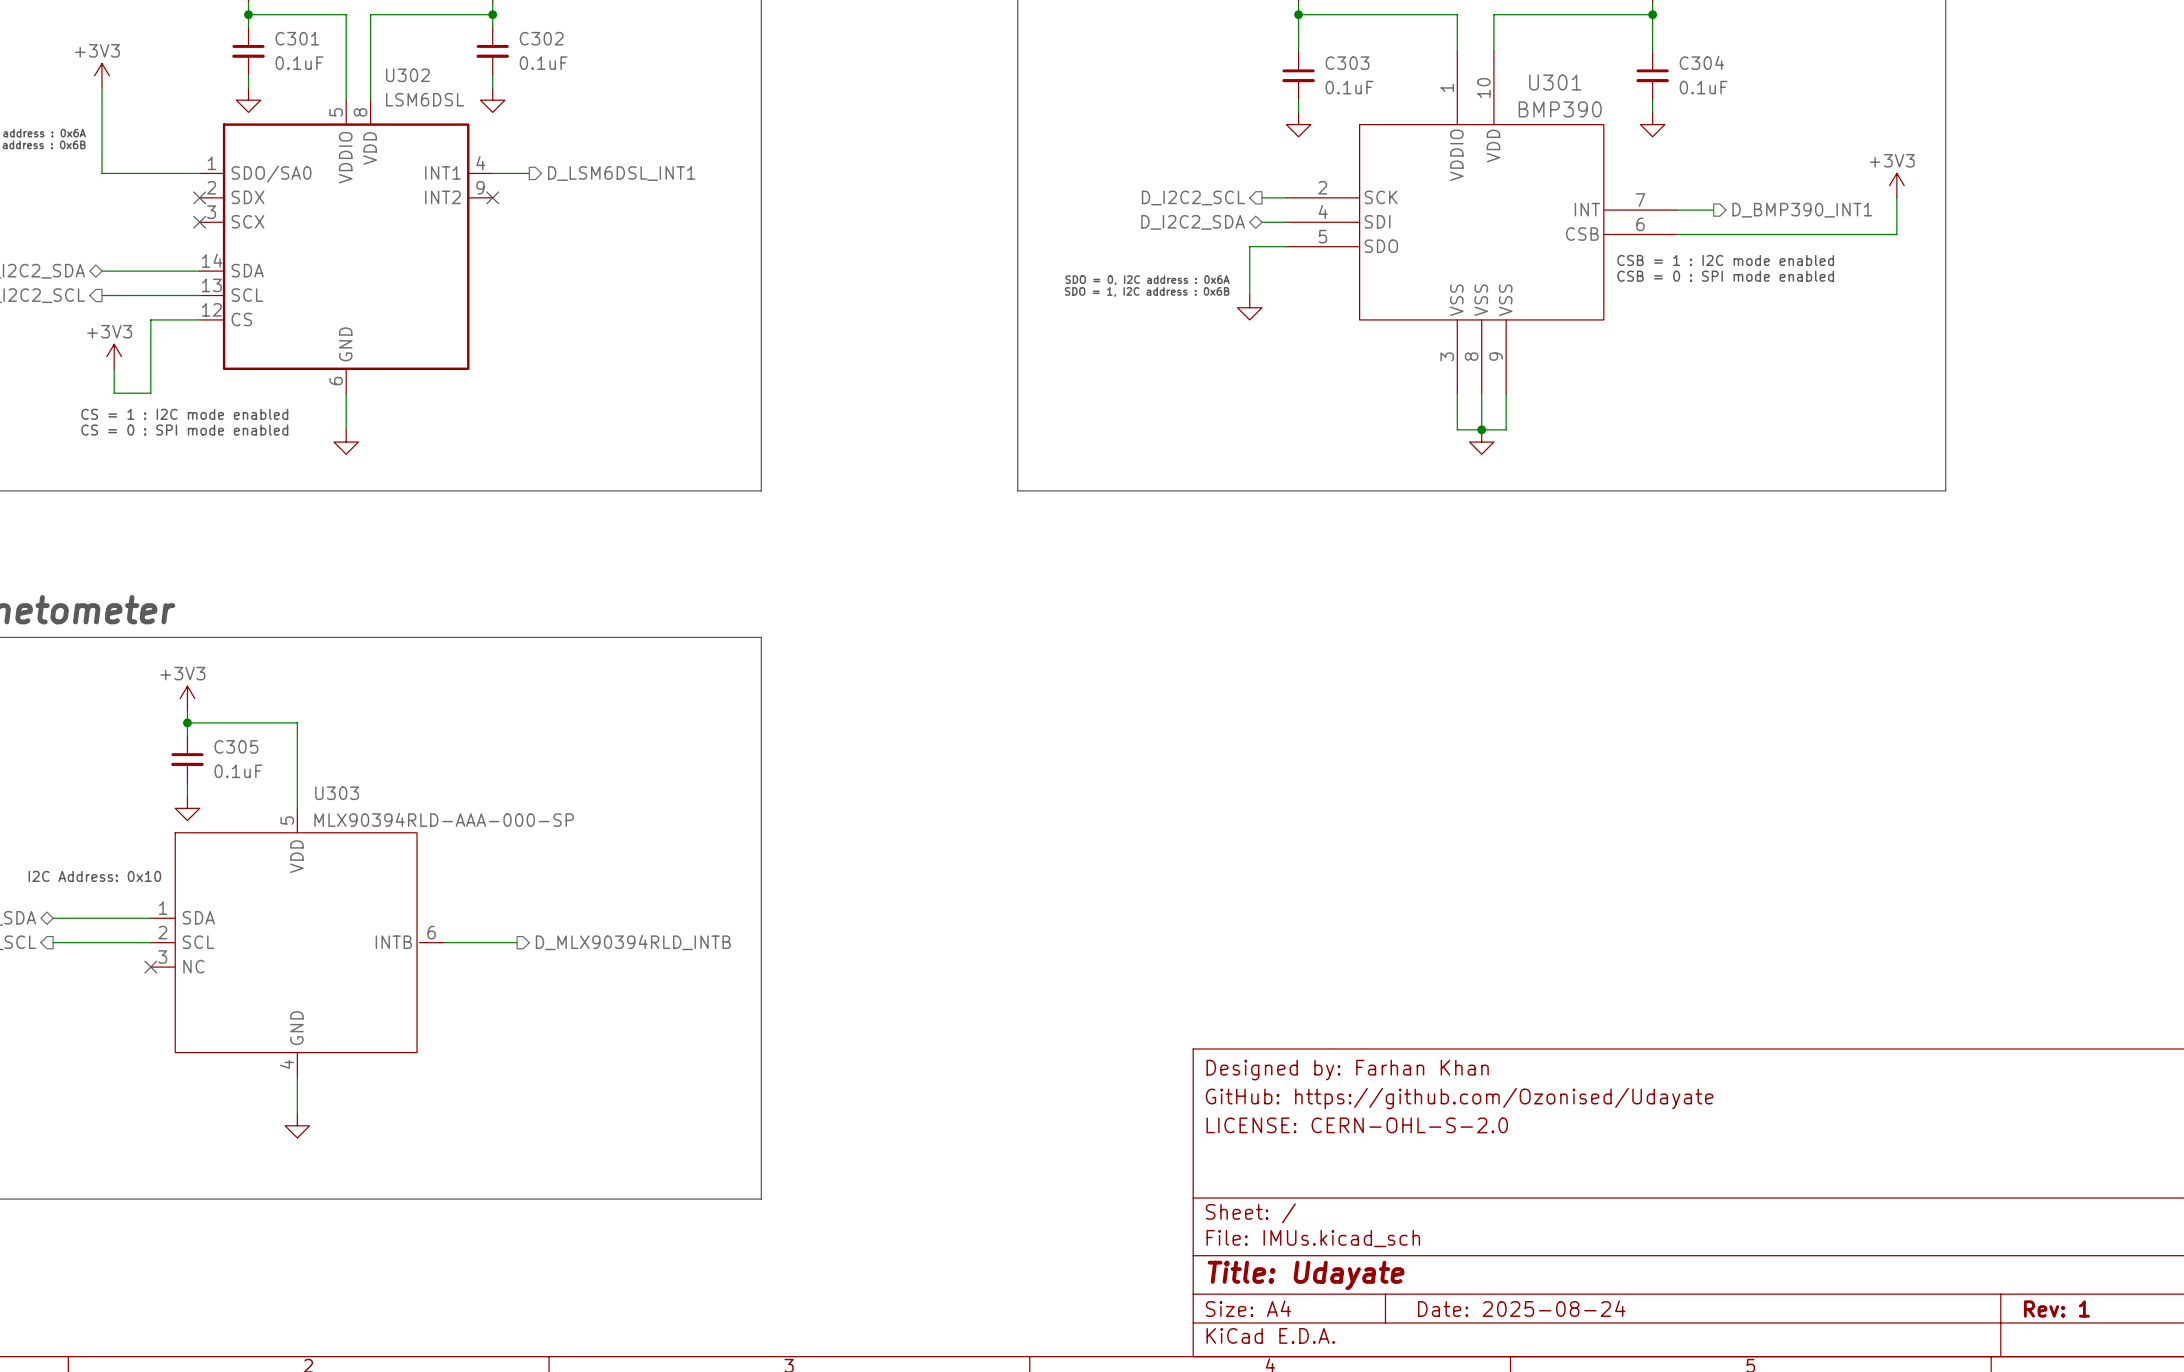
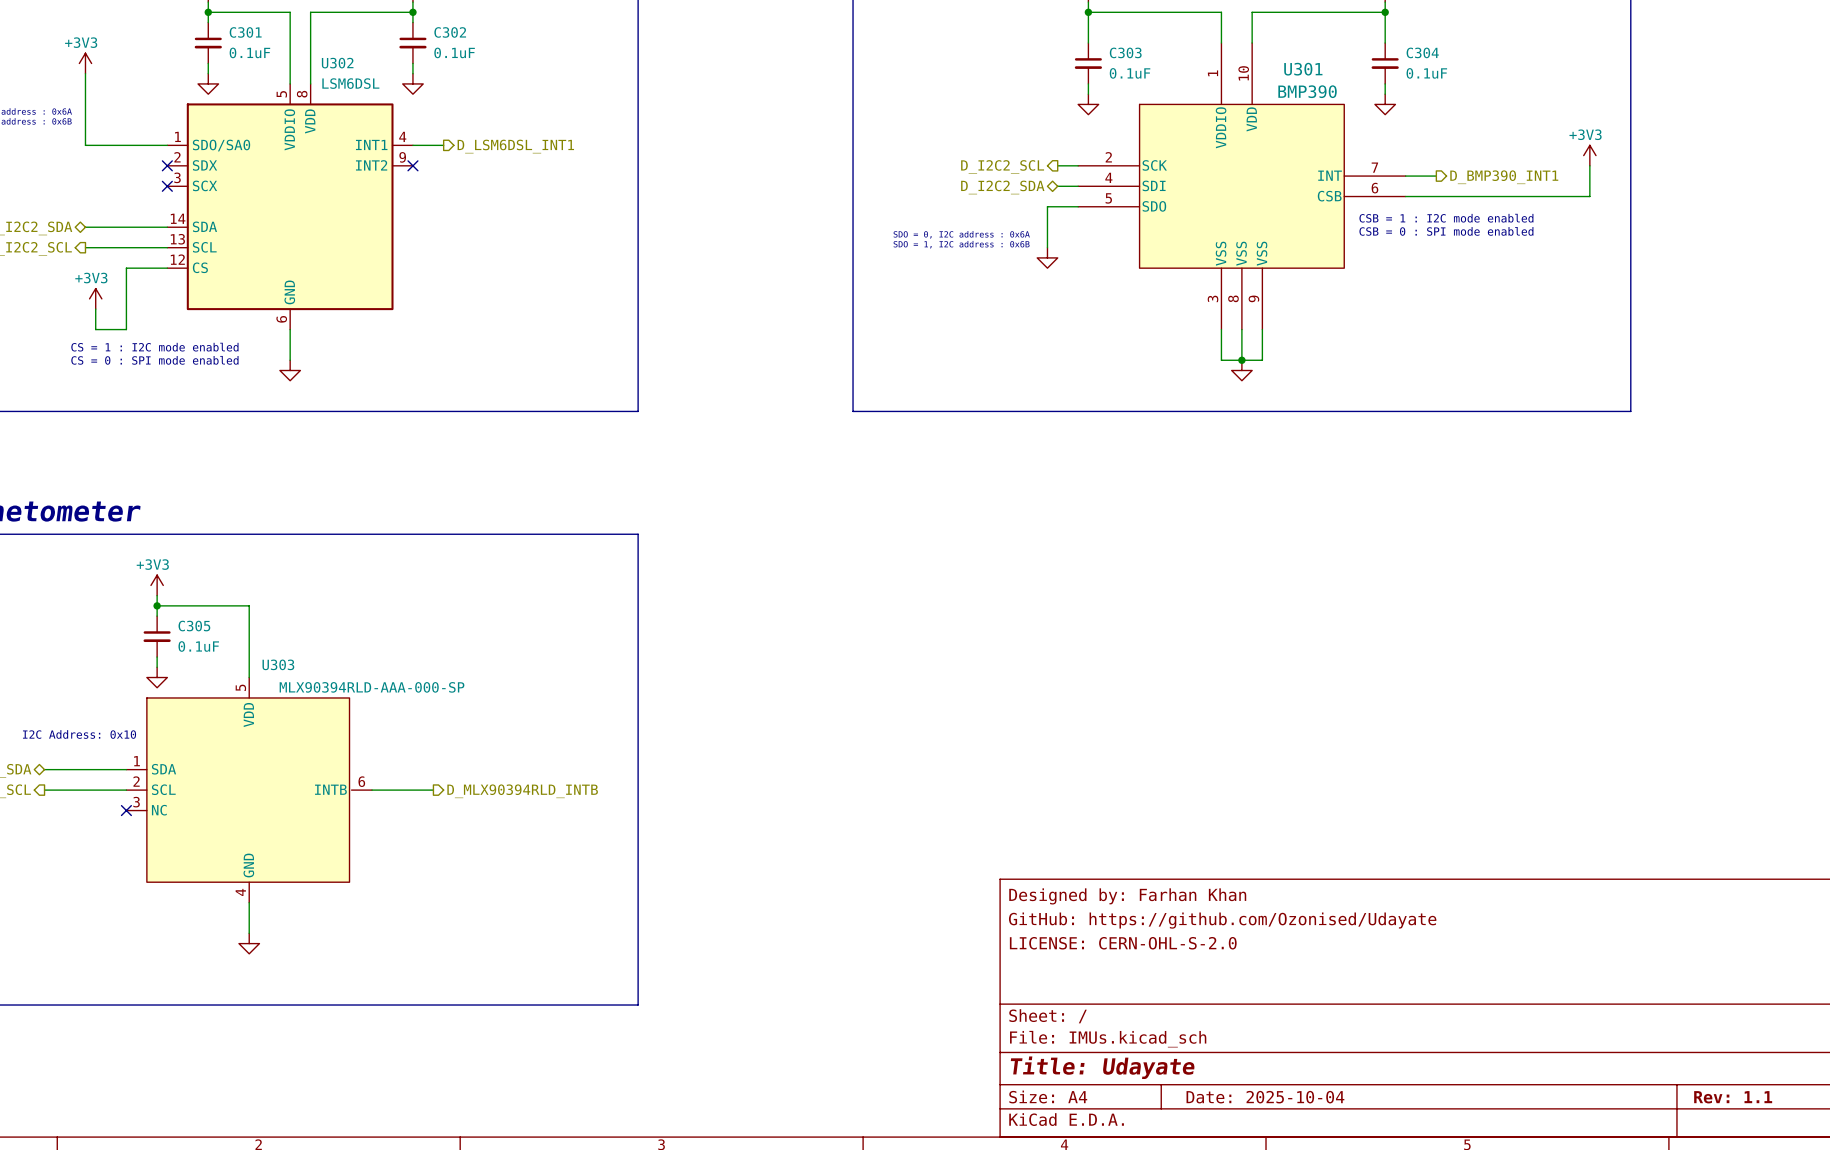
title block: Date: 2025-08-24 (1521, 1308) -> Date: 2025-10-04 (1265, 1097)
title block: Rev: 1 (2056, 1309) -> Rev: 1.1 (1733, 1097)

